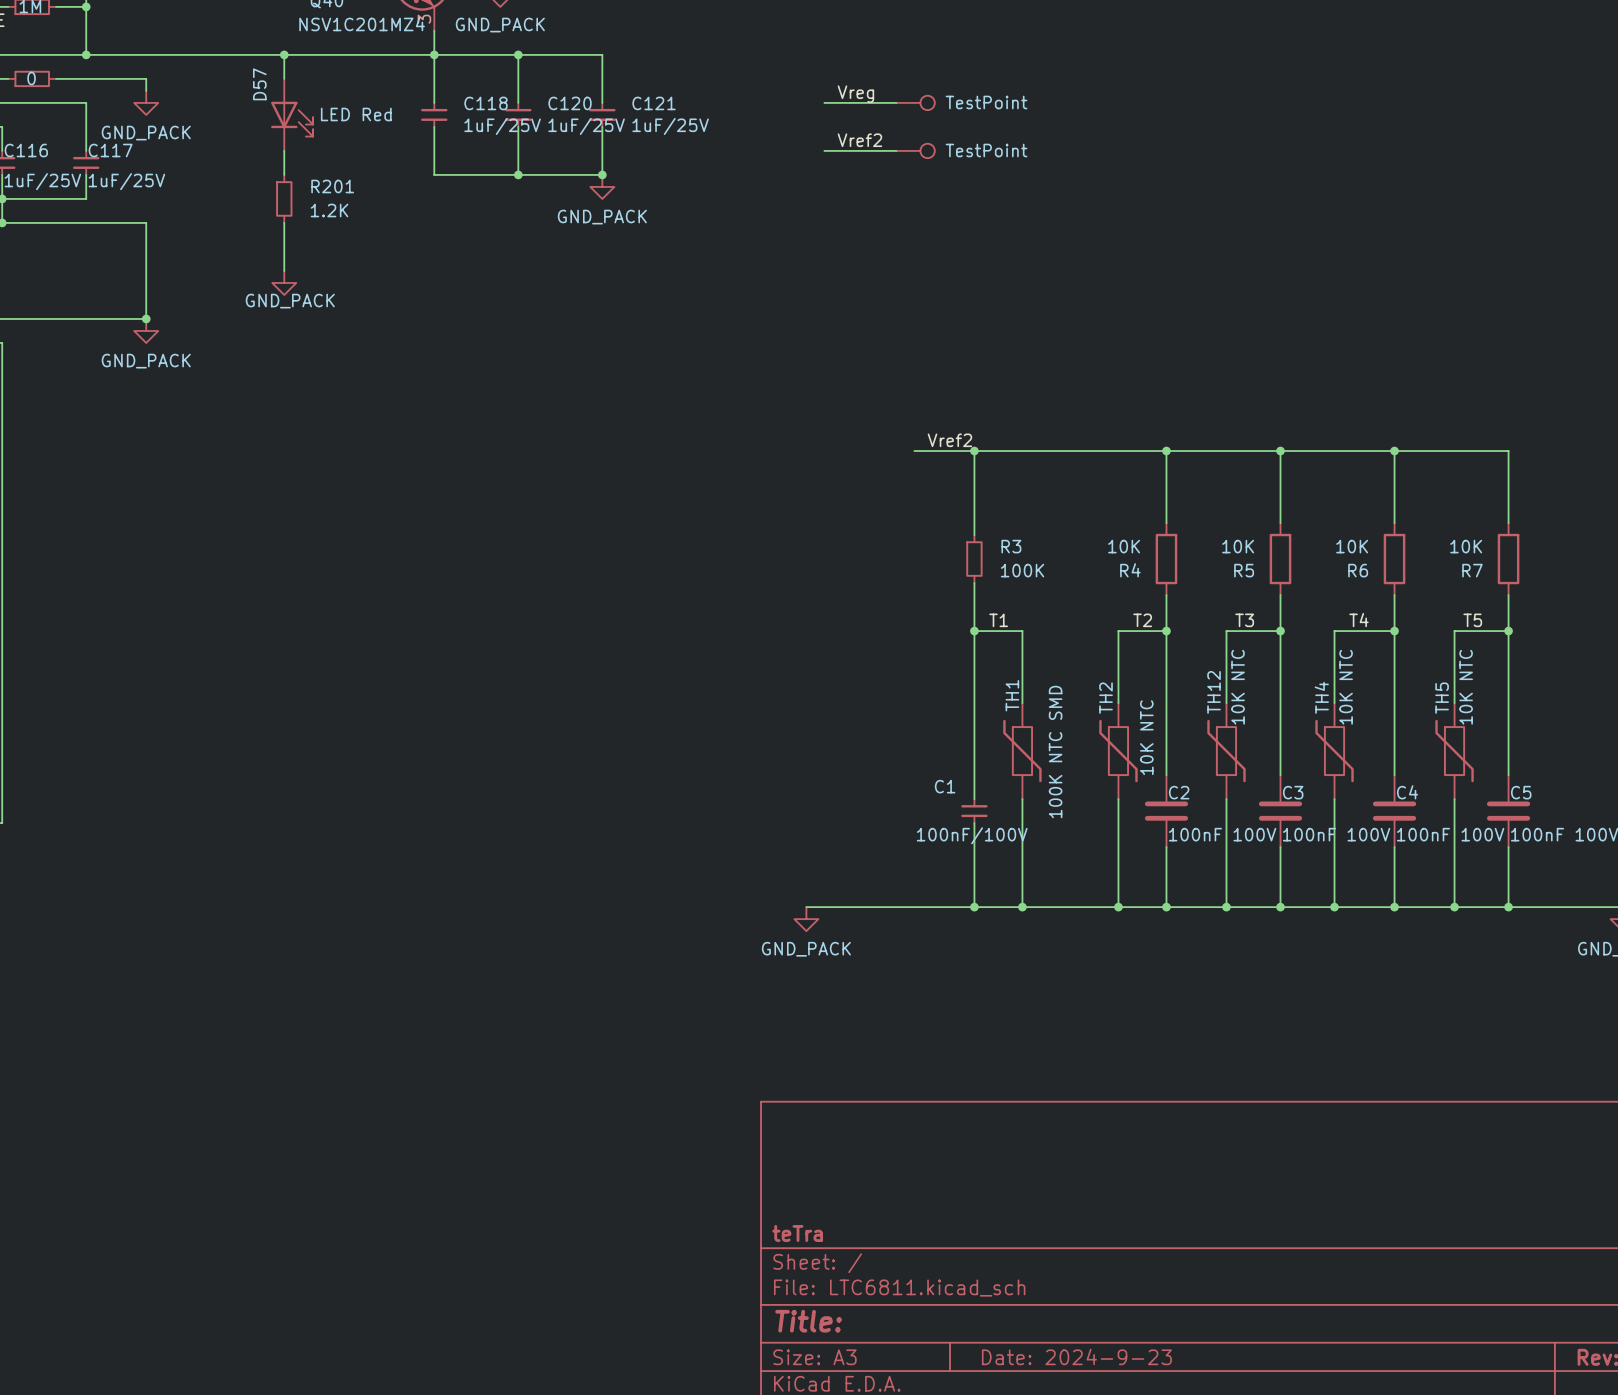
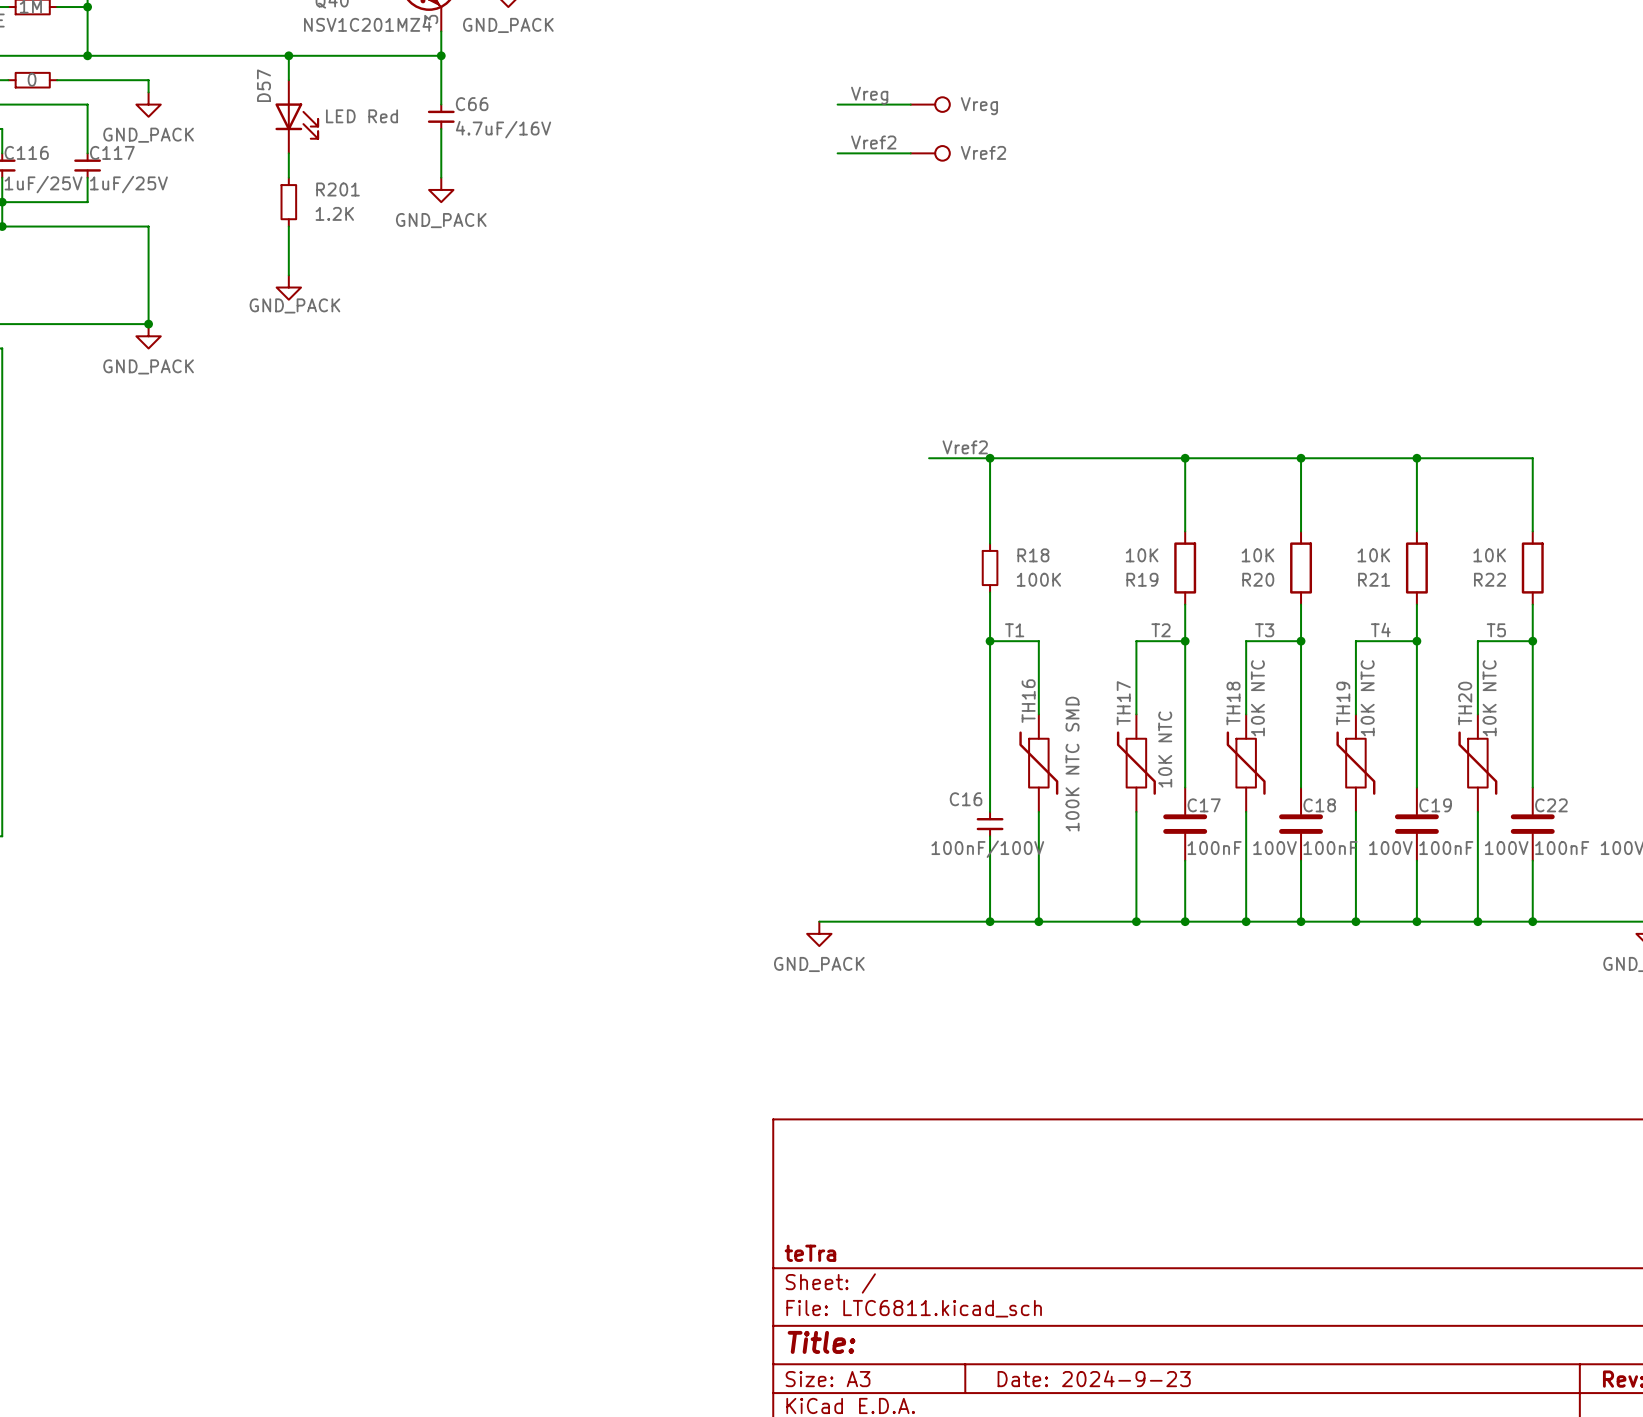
wire: (434, 54) (602, 54) (602, 102) -> none
wire: (518, 54) (518, 102) -> none
junction: (518, 54) -> none
part value: TestPoint (986, 102) -> Vreg (979, 106)
C118 name: C118 (486, 103) -> C66 (472, 104)
C120: 1uF/25V (518, 114) -> none
C121: 1uF/25V (602, 114) -> none
C118 value: 1uF/25V (502, 126) -> 4.7uF/16V (503, 129)
wire: (518, 126) (518, 174) -> none
wire: (602, 126) (602, 174) (434, 174) -> none
part value: TestPoint (986, 150) -> Vref2 (983, 152)
junction: (518, 174) -> none
junction: (602, 174) -> none
power symbol position: GND_PACK (602, 186) -> GND_PACK (441, 189)
R3 name: R3 (1011, 546) -> R18 (1033, 555)
R4 name: R4 (1130, 570) -> R19 (1142, 579)
R5 name: R5 (1244, 570) -> R20 (1258, 579)
R6 name: R6 (1358, 570) -> R21 (1374, 579)
R7 name: R7 (1472, 570) -> R22 (1489, 579)
TH12 name: TH12 (1214, 692) -> TH18 (1233, 703)
TH1 name: TH1 (1012, 695) -> TH16 (1028, 701)
TH4 name: TH4 (1321, 697) -> TH19 (1343, 703)
TH2 name: TH2 (1106, 698) -> TH17 (1123, 703)
TH5 name: TH5 (1442, 698) -> TH20 (1465, 703)
C1 name: C1 (945, 786) -> C16 (966, 799)
C2 name: C2 (1179, 792) -> C17 (1204, 805)
C3 name: C3 (1293, 792) -> C18 (1319, 805)
C4 name: C4 (1407, 792) -> C19 (1435, 805)
C5 name: C5 (1521, 792) -> C22 (1551, 805)

